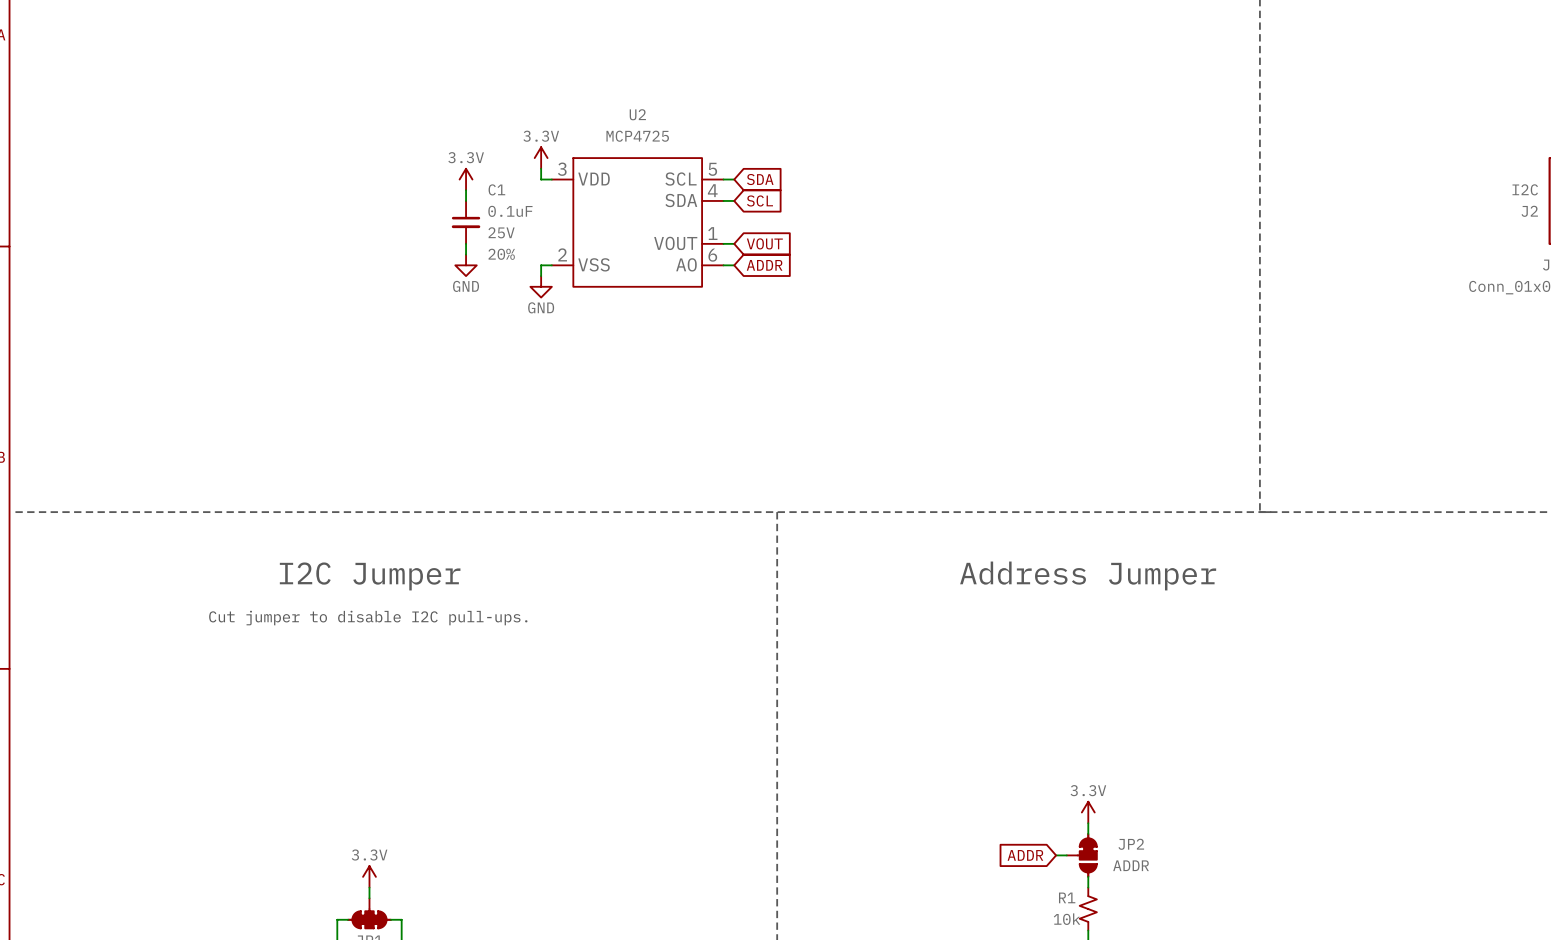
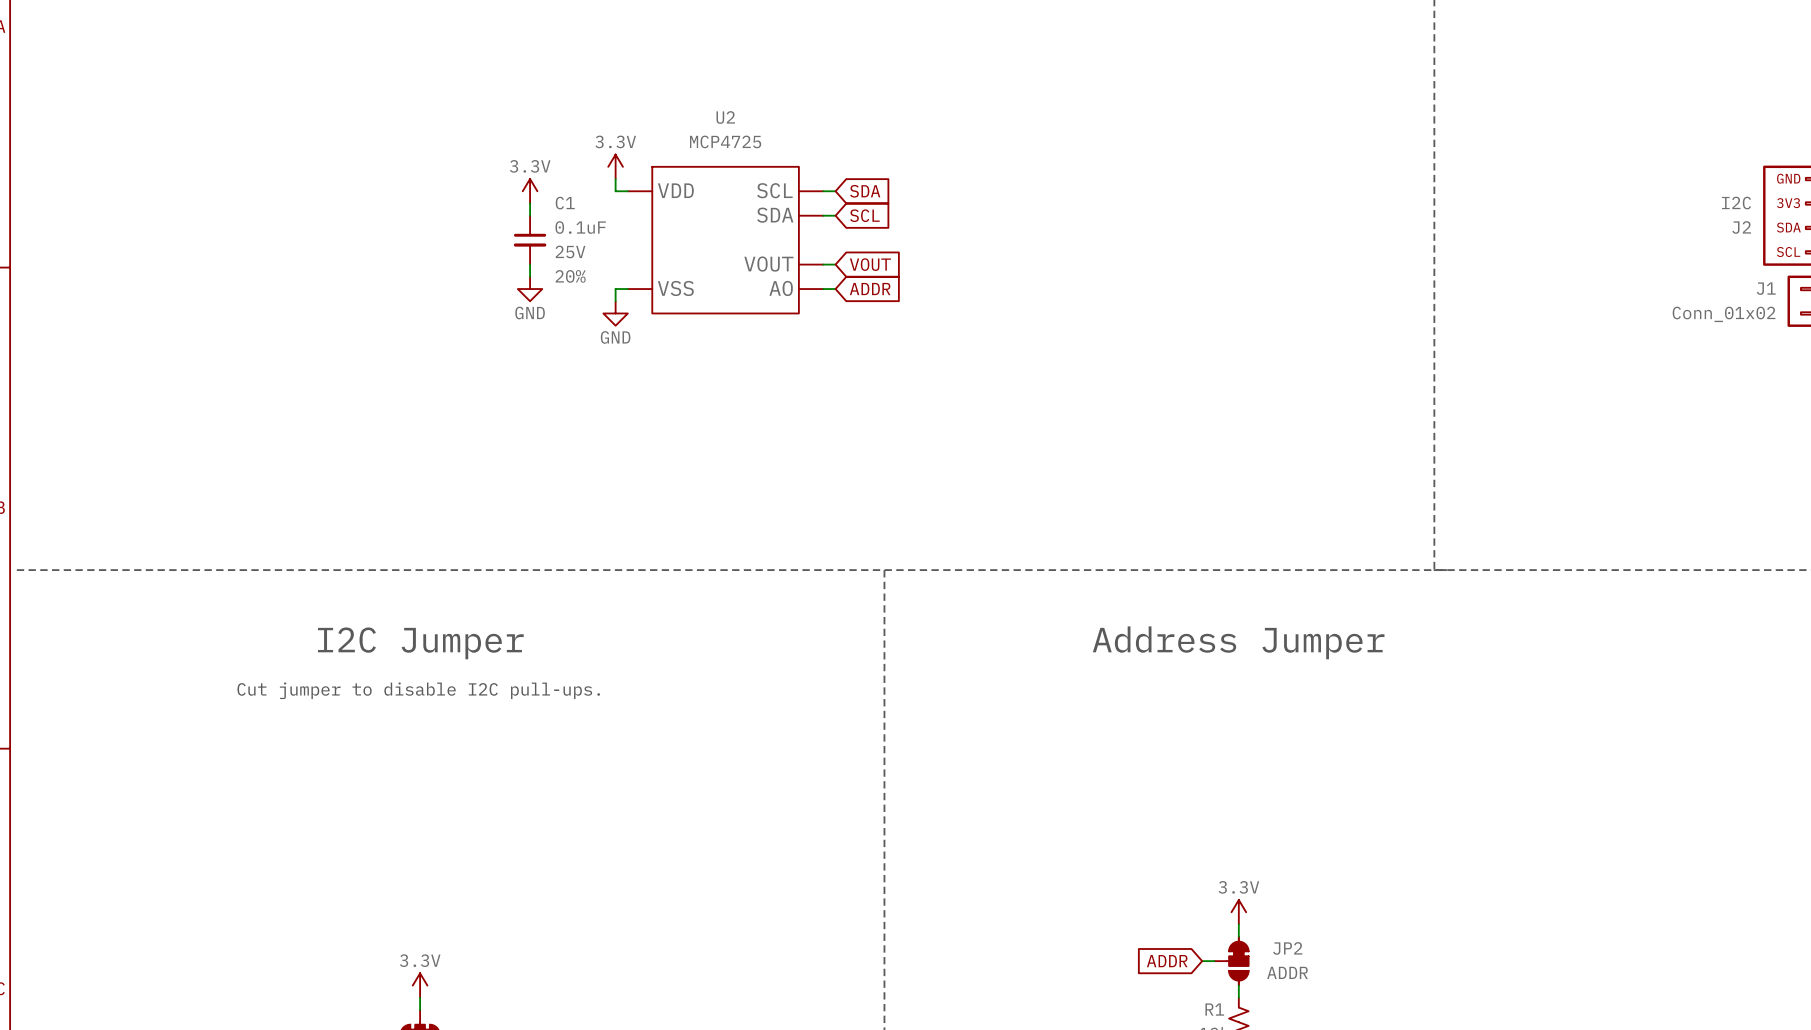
U2 pin number: 3 (562, 169) -> none
U2 pin number: 5 (712, 169) -> none
U2 pin number: 4 (712, 190) -> none
U2 pin number: 1 (712, 233) -> none
U2 pin number: 2 (562, 254) -> none
U2 pin number: 6 (712, 255) -> none

